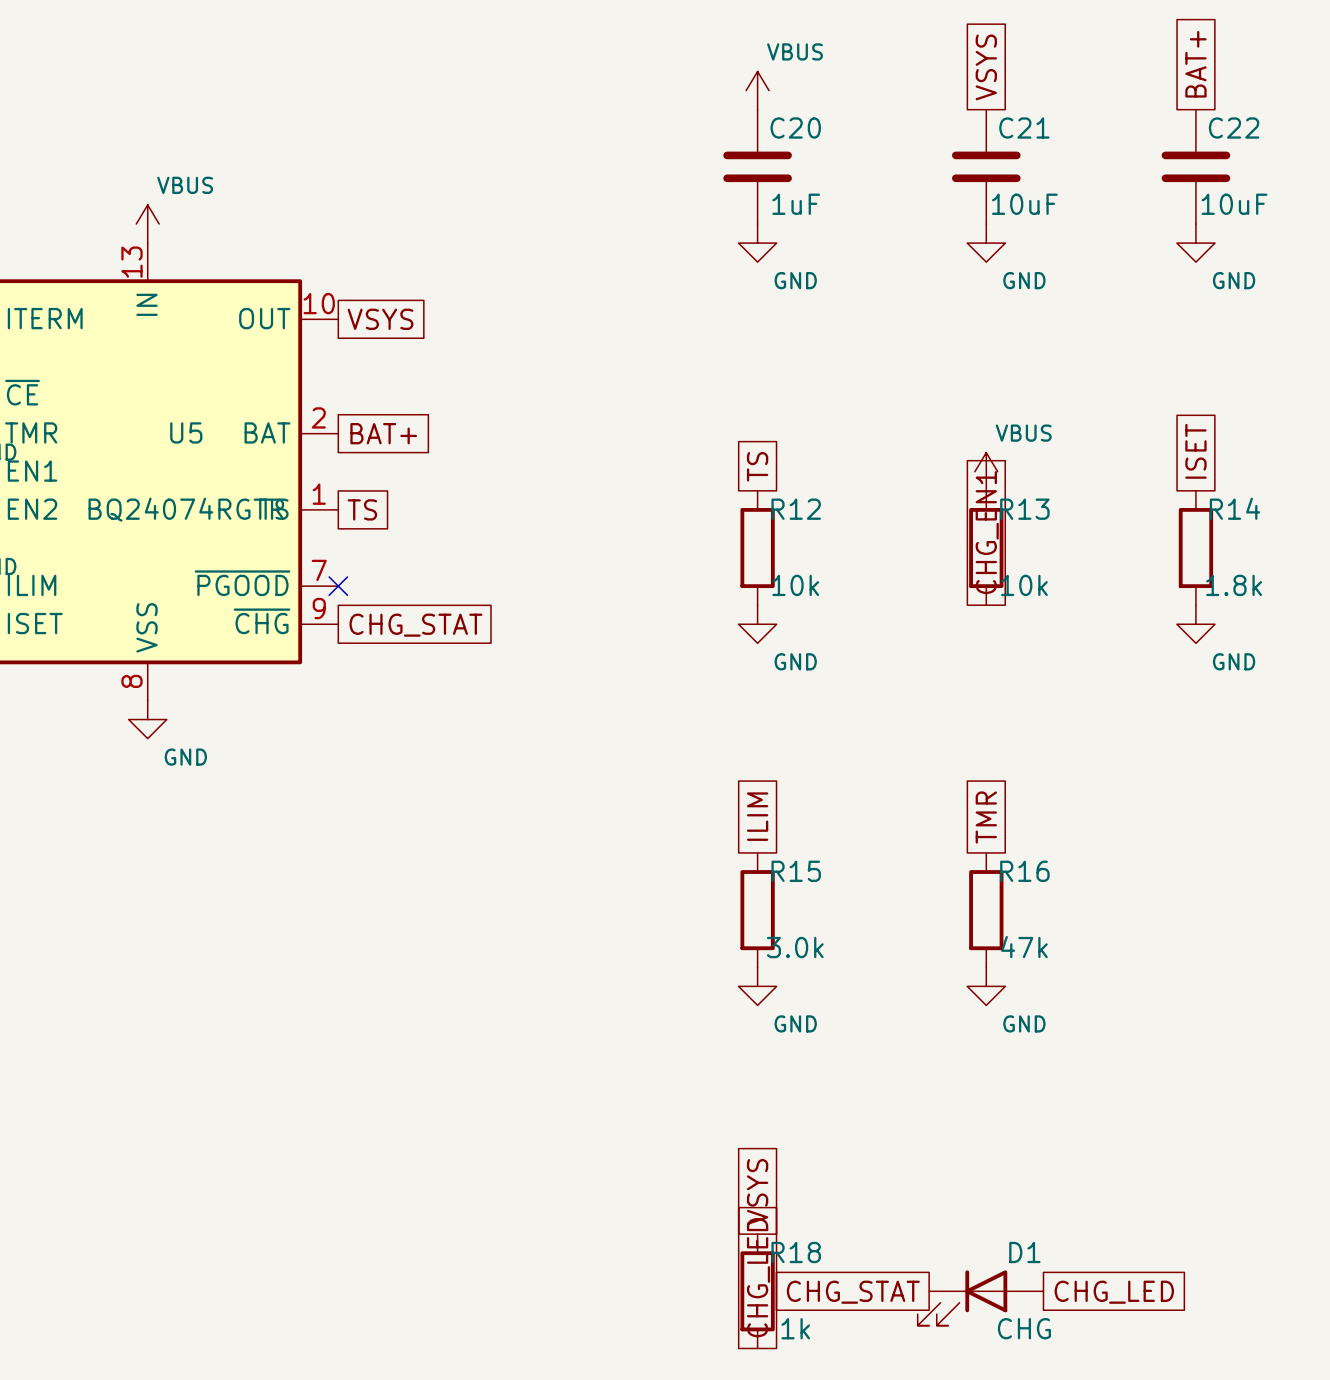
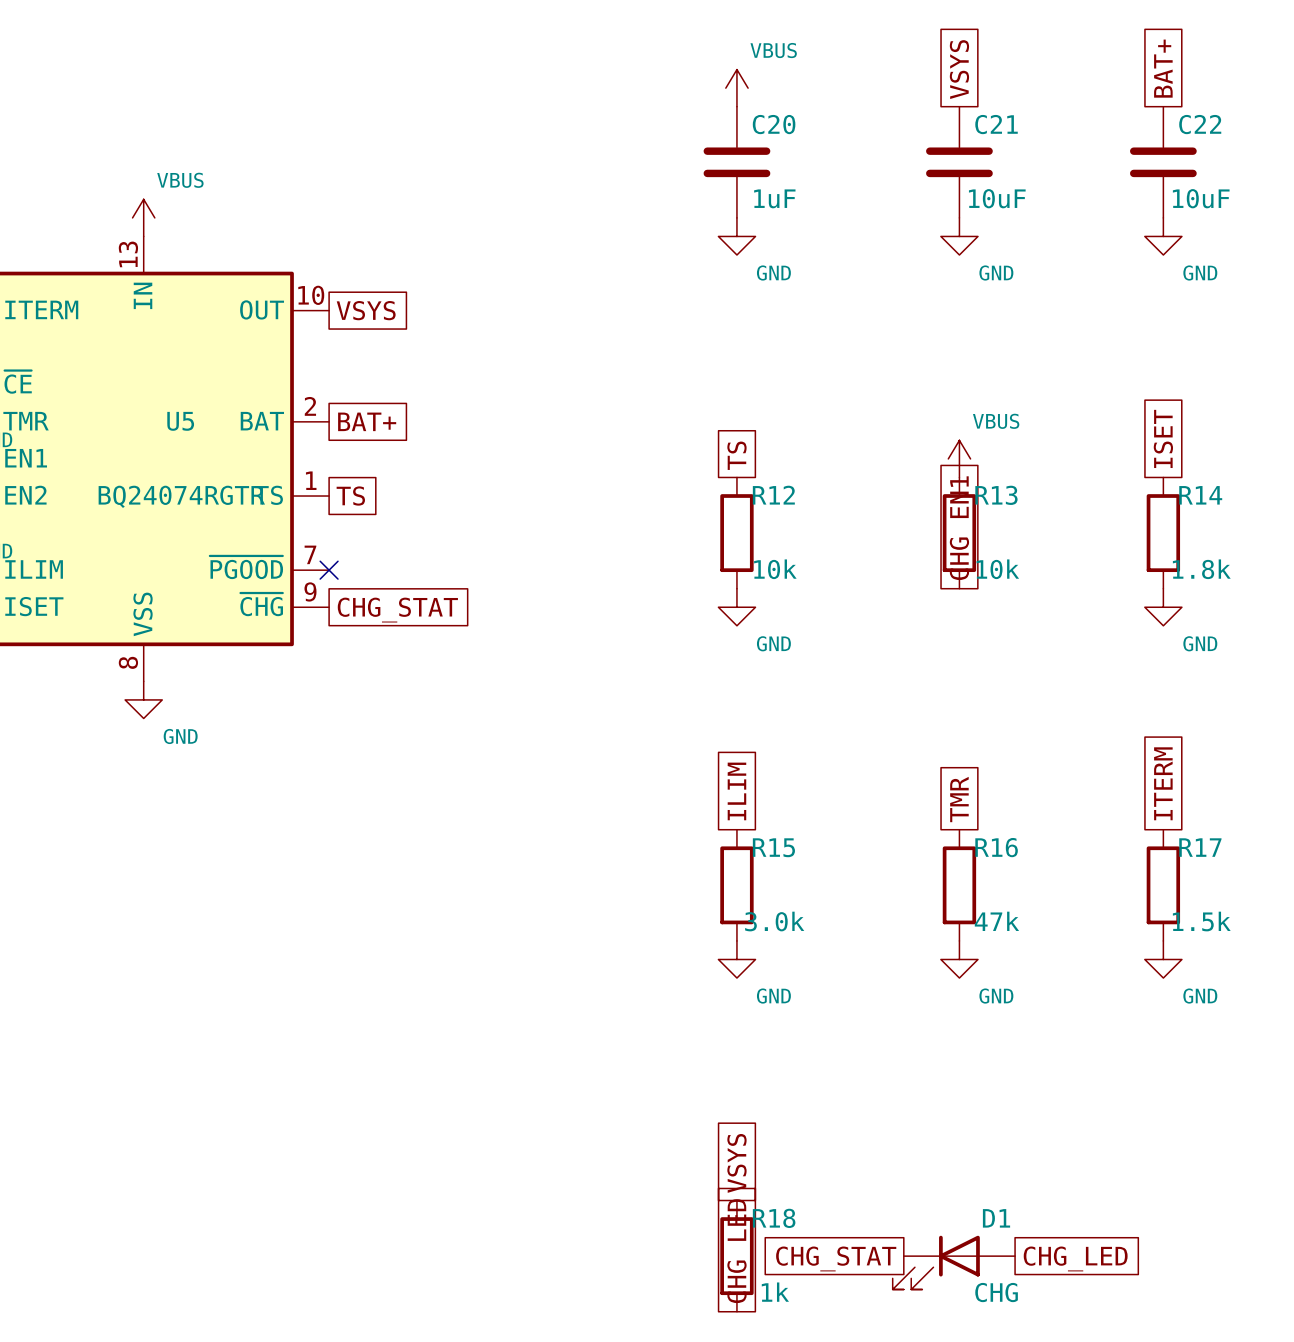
global label: none -> ITERM (1163, 783)
R17: none -> 1.5k (1163, 885)
power symbol: none -> GND (1163, 959)

